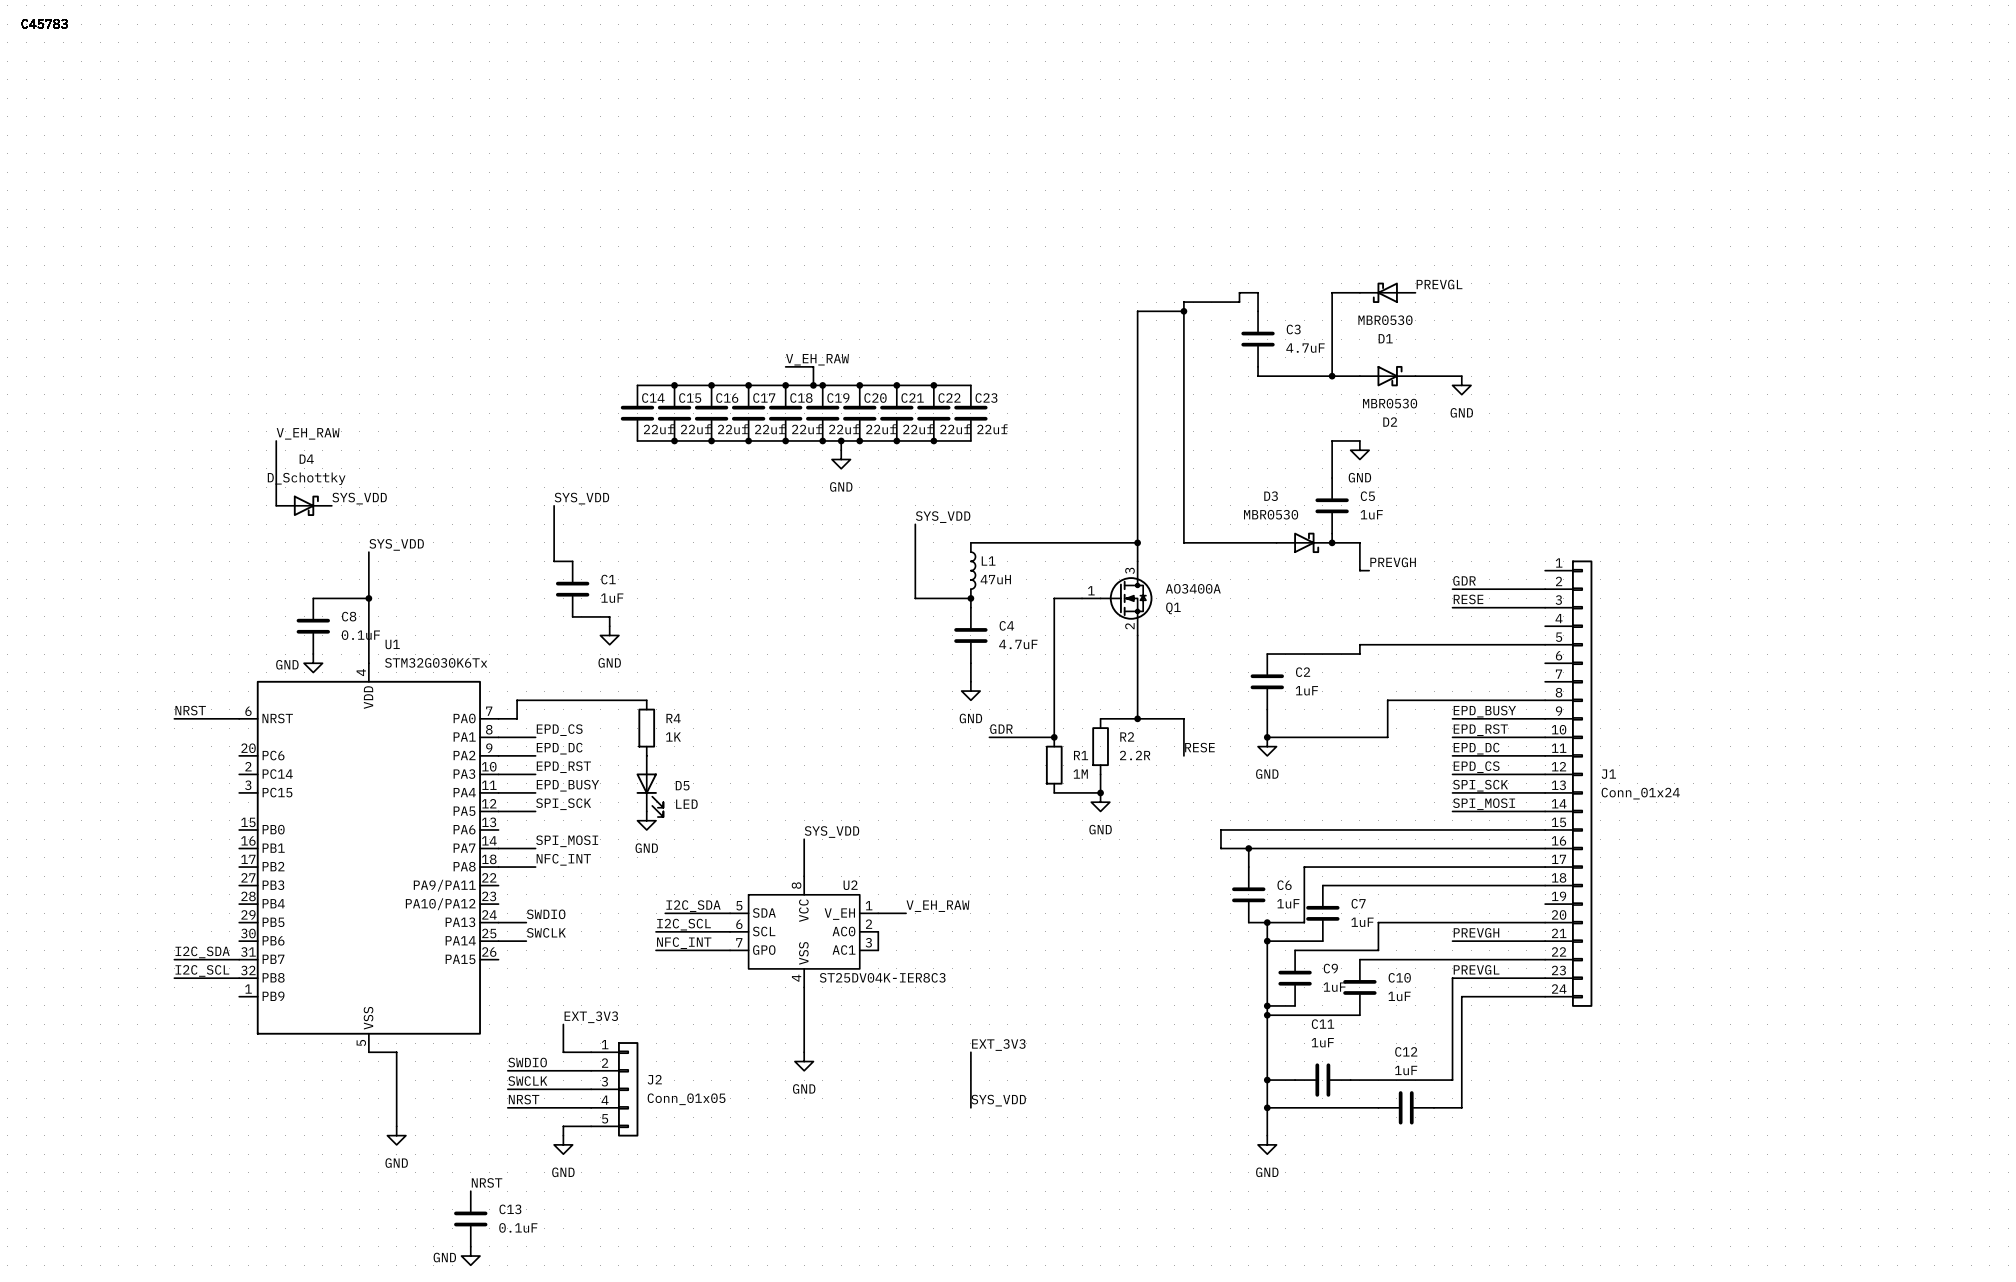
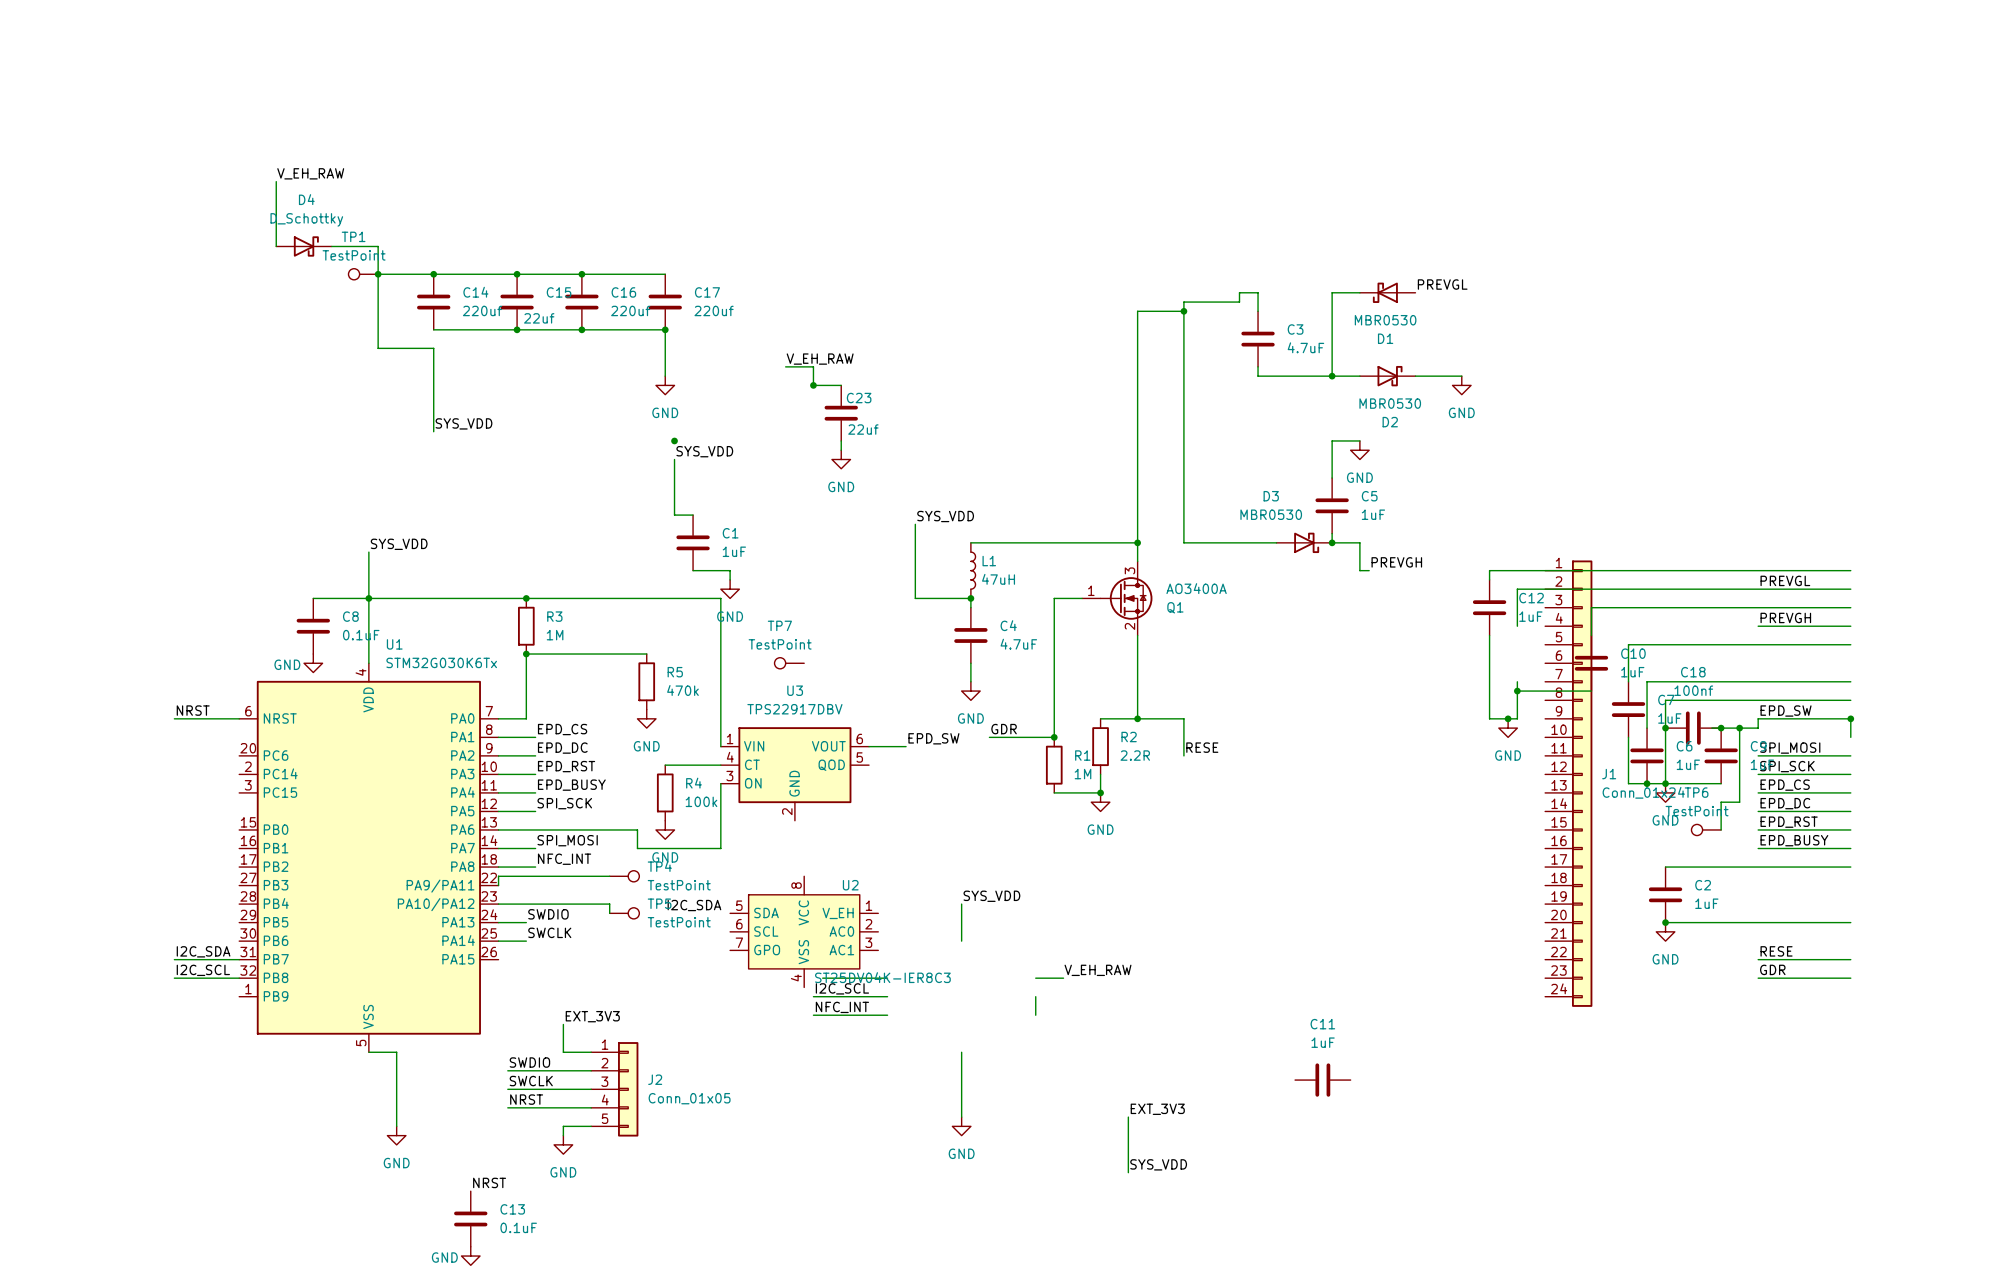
C23 text: C45783 (44, 23) -> none
C18 text: C45783 (44, 23) -> none
C15 text: C45783 (44, 23) -> none
C17 text: C45783 (44, 23) -> none
C16 text: C45783 (44, 23) -> none
label: none -> V_EH_RAW (310, 173)
wire: none -> (276, 181) (276, 246)
wire: none -> (331, 246) (378, 246) (378, 348) (433, 348) (433, 431)
TP1: none -> TestPoint (363, 274)
wire: none -> (378, 274) (665, 274)
junction: none -> (378, 274)
junction: none -> (433, 274)
junction: none -> (517, 274)
junction: none -> (581, 274)
wire: none -> (433, 329) (665, 329) (665, 376)
junction: none -> (517, 329)
junction: none -> (581, 329)
junction: none -> (665, 329)
wire: (637, 385) (813, 385) -> none
power symbol: none -> GND (665, 385)
junction: (674, 385) -> none
junction: (711, 385) -> none
junction: (748, 385) -> none
junction: (785, 385) -> none
junction: (822, 385) -> none
wire: (841, 385) (970, 385) -> none
junction: (859, 385) -> none
junction: (896, 385) -> none
junction: (933, 385) -> none
C14 name position: C14 (653, 398) -> C14 (475, 292)
C15 name position: C15 (690, 398) -> C15 (559, 292)
C16 name position: C16 (727, 398) -> C16 (623, 292)
C17 name position: C17 (764, 398) -> C17 (707, 292)
C18 name position: C18 (801, 398) -> C18 (1693, 672)
C14 position: (637, 413) -> (433, 302)
C15 position: (674, 413) -> (517, 302)
C16 position: (711, 413) -> (581, 302)
C17 position: (748, 413) -> (665, 302)
C18 rotation: 0° (785, 413) -> 90° clockwise (1693, 728)
C18 position: (785, 413) -> (1693, 728)
C19: 22uf (822, 413) -> none
C20: 22uf (859, 413) -> none
C21: 22uf (896, 413) -> none
C22: 22uf (933, 413) -> none
C23 position: (970, 413) -> (841, 413)
label: none -> SYS_VDD (463, 423)
C14 value: 22uf (659, 429) -> 220uf (482, 310)
C16 value: 22uf (733, 429) -> 220uf (630, 310)
C17 value: 22uf (770, 429) -> 220uf (714, 310)
C18 value: 22uf (807, 429) -> 100nf (1693, 690)
label: V_EH_RAW (308, 433) -> none
wire: (276, 440) (276, 505) -> none
wire: (637, 440) (970, 440) -> none
junction: (711, 440) -> none
junction: (748, 440) -> none
junction: (785, 440) -> none
junction: (822, 440) -> none
junction: (841, 440) -> none
junction: (859, 440) -> none
junction: (896, 440) -> none
junction: (933, 440) -> none
label: none -> SYS_VDD (704, 451)
label: SYS_VDD (359, 498) -> none
label: SYS_VDD (581, 498) -> none
D4 position: (304, 505) -> (304, 246)
wire: (554, 505) (554, 561) (572, 561) -> (674, 459) (674, 515) (693, 515)
wire: none -> (1850, 570) (1489, 570) (1489, 579)
label: GDR (1464, 580) -> none
label: none -> PREVGL (1785, 580)
C1 position: (572, 589) -> (693, 542)
power symbol: none -> GND (730, 589)
wire: (1452, 589) (1517, 589) -> (1517, 626) (1517, 589)
wire: none -> (1545, 589) (1850, 589)
wire: none -> (368, 598) (720, 598) (720, 746)
junction: none -> (526, 598)
label: RESE (1468, 599) -> none
wire: (1452, 607) (1545, 607) -> none
wire: none -> (1850, 607) (1591, 607) (1591, 635)
wire: (572, 616) (609, 616) (609, 626) -> (693, 570) (730, 570) (730, 579)
label: none -> PREVGH (1785, 617)
R3: none -> 1M (526, 626)
wire: none -> (1758, 626) (1850, 626)
power symbol: GND (609, 635) -> none
wire: (1545, 644) (1359, 644) (1359, 654) (1267, 654) -> none
wire: none -> (1850, 644) (1628, 644) (1628, 681)
junction: none -> (526, 654)
TP7: none -> TestPoint (789, 663)
R5: none -> 470k (646, 681)
C2 position: (1267, 681) -> (1665, 894)
wire: none -> (1850, 681) (1647, 681) (1647, 728)
wire: none -> (1517, 691) (1591, 691)
junction: none -> (1517, 691)
wire: (646, 700) (517, 700) (517, 718) -> (646, 654) (526, 654) (526, 718) (517, 718)
wire: (1545, 700) (1387, 700) (1387, 737) (1267, 737) (1267, 709) -> none
wire: none -> (1850, 700) (1665, 700) (1665, 783)
label: EPD_BUSY (1484, 711) -> none
label: none -> EPD_SW (1786, 711)
power symbol: none -> GND (646, 718)
wire: (1452, 718) (1489, 718) -> (1489, 635) (1489, 718)
junction: none -> (1508, 718)
wire: (1517, 718) (1545, 718) -> (1517, 718) (1517, 681)
junction: none -> (1850, 718)
R4 position: (646, 728) -> (665, 792)
power symbol: none -> GND (1508, 728)
junction: none -> (1665, 728)
wire: none -> (1711, 728) (1758, 728) (1758, 718) (1850, 718) (1850, 737)
junction: none -> (1721, 728)
wire: none -> (1739, 728) (1739, 802) (1721, 802) (1721, 829)
junction: none -> (1739, 728)
label: EPD_RST (1480, 730) -> none
R4 value: 1K (673, 737) -> 100k (701, 801)
junction: (1267, 737) -> none
wire: (1452, 737) (1545, 737) -> none
wire: none -> (1628, 737) (1628, 783) (1721, 783)
label: none -> EPD_SW (933, 738)
wire: none -> (869, 746) (906, 746)
power symbol: GND (1267, 746) -> none
label: EPD_DC (1476, 748) -> none
label: none -> SPI_MOSI (1790, 748)
wire: (1452, 755) (1545, 755) -> none
wire: none -> (1758, 755) (1850, 755)
wire: none -> (665, 765) (720, 765)
label: EPD_CS (1476, 767) -> none
label: none -> SPI_SCK (1787, 766)
U3: none -> TPS22917DBV (794, 773)
wire: (1452, 774) (1545, 774) -> none
wire: none -> (1758, 774) (1850, 774)
wire: none -> (720, 783) (720, 848) (637, 848) (637, 829) (498, 829)
junction: none -> (1647, 783)
junction: none -> (1665, 783)
label: SPI_SCK (1480, 785) -> none
label: none -> EPD_CS (1785, 785)
D5: LED (649, 786) -> none
wire: (1452, 792) (1545, 792) -> none
power symbol: none -> GND (1665, 792)
wire: none -> (1758, 792) (1850, 792)
label: SPI_MOSI (1484, 804) -> none
label: none -> EPD_DC (1785, 803)
wire: (1452, 811) (1545, 811) -> none
wire: none -> (1758, 811) (1850, 811)
power symbol position: GND (646, 820) -> GND (665, 829)
label: none -> EPD_RST (1789, 822)
wire: (1545, 829) (1220, 829) (1220, 848) (1545, 848) -> none
TP6: none -> TestPoint (1706, 829)
wire: none -> (1758, 829) (1850, 829)
label: SYS_VDD (831, 832) -> none
wire: (804, 839) (804, 876) -> (961, 904) (961, 941)
label: none -> EPD_BUSY (1794, 840)
wire: (1248, 848) (1248, 867) -> none
junction: (1248, 848) -> none
wire: none -> (1758, 848) (1850, 848)
wire: (1545, 867) (1304, 867) (1304, 922) (1248, 922) -> none
wire: none -> (1665, 867) (1850, 867)
wire: none -> (609, 876) (498, 876) (498, 885)
TP4: none -> TestPoint (624, 876)
wire: (1322, 885) (1545, 885) -> none
C6 position: (1248, 894) -> (1647, 755)
label: none -> SYS_VDD (991, 896)
wire: none -> (498, 904) (609, 904) (609, 913)
label position: V_EH_RAW (937, 906) -> V_EH_RAW (1097, 970)
TP5: none -> TestPoint (624, 913)
wire: (665, 913) (730, 913) -> (822, 978) (887, 978)
wire: (878, 913) (906, 913) -> (1035, 978) (1063, 978)
C7 position: (1322, 913) -> (1628, 709)
wire: (1267, 922) (1267, 1135) -> none
junction: (1267, 922) -> none
wire: (1545, 922) (1378, 922) (1378, 950) (1295, 950) -> none
wire: none -> (1665, 922) (1850, 922)
junction: none -> (1665, 922)
label position: I2C_SCL (683, 924) -> I2C_SCL (842, 988)
wire: (656, 931) (730, 931) -> (813, 996) (887, 996)
wire: (878, 931) (878, 950) -> (1035, 996) (1035, 1015)
power symbol: none -> GND (1665, 931)
label: PREVGH (1476, 932) -> none
wire: (1267, 941) (1322, 941) -> none
junction: (1267, 941) -> none
wire: (1452, 941) (1545, 941) -> none
label position: NFC_INT (684, 943) -> NFC_INT (842, 1007)
wire: (656, 950) (730, 950) -> (813, 1015) (887, 1015)
label: none -> RESE (1776, 951)
wire: (1359, 959) (1545, 959) -> none
wire: none -> (1758, 959) (1850, 959)
label: PREVGL (1476, 969) -> none
label: none -> GDR (1772, 969)
C9 position: (1295, 978) -> (1721, 755)
wire: (1545, 978) (1452, 978) (1452, 1080) (1350, 1080) -> none
wire: none -> (1758, 978) (1850, 978)
wire: (804, 987) (804, 1052) -> (961, 1052) (961, 1117)
C10 position: (1359, 987) -> (1591, 663)
wire: (1545, 996) (1461, 996) (1461, 1107) (1434, 1107) -> none
wire: (1267, 1005) (1295, 1005) -> none
junction: (1267, 1005) -> none
wire: (1267, 1015) (1359, 1015) -> none
junction: (1267, 1015) -> none
label position: EXT_3V3 (998, 1045) -> EXT_3V3 (1157, 1109)
C12 name position: C12 (1406, 1051) -> C12 (1531, 598)
wire: (970, 1052) (970, 1107) -> (1128, 1117) (1128, 1172)
power symbol: GND (804, 1061) -> none
wire: (1267, 1080) (1295, 1080) -> none
junction: (1267, 1080) -> none
label: SYS_VDD (998, 1100) -> none
wire: (1267, 1107) (1378, 1107) -> none
junction: (1267, 1107) -> none
C12 rotation: 0° (1406, 1107) -> 90° clockwise (1489, 607)
C12 position: (1406, 1107) -> (1489, 607)
power symbol: none -> GND (961, 1126)
power symbol: GND (1267, 1144) -> none
label: none -> SYS_VDD (1158, 1164)

